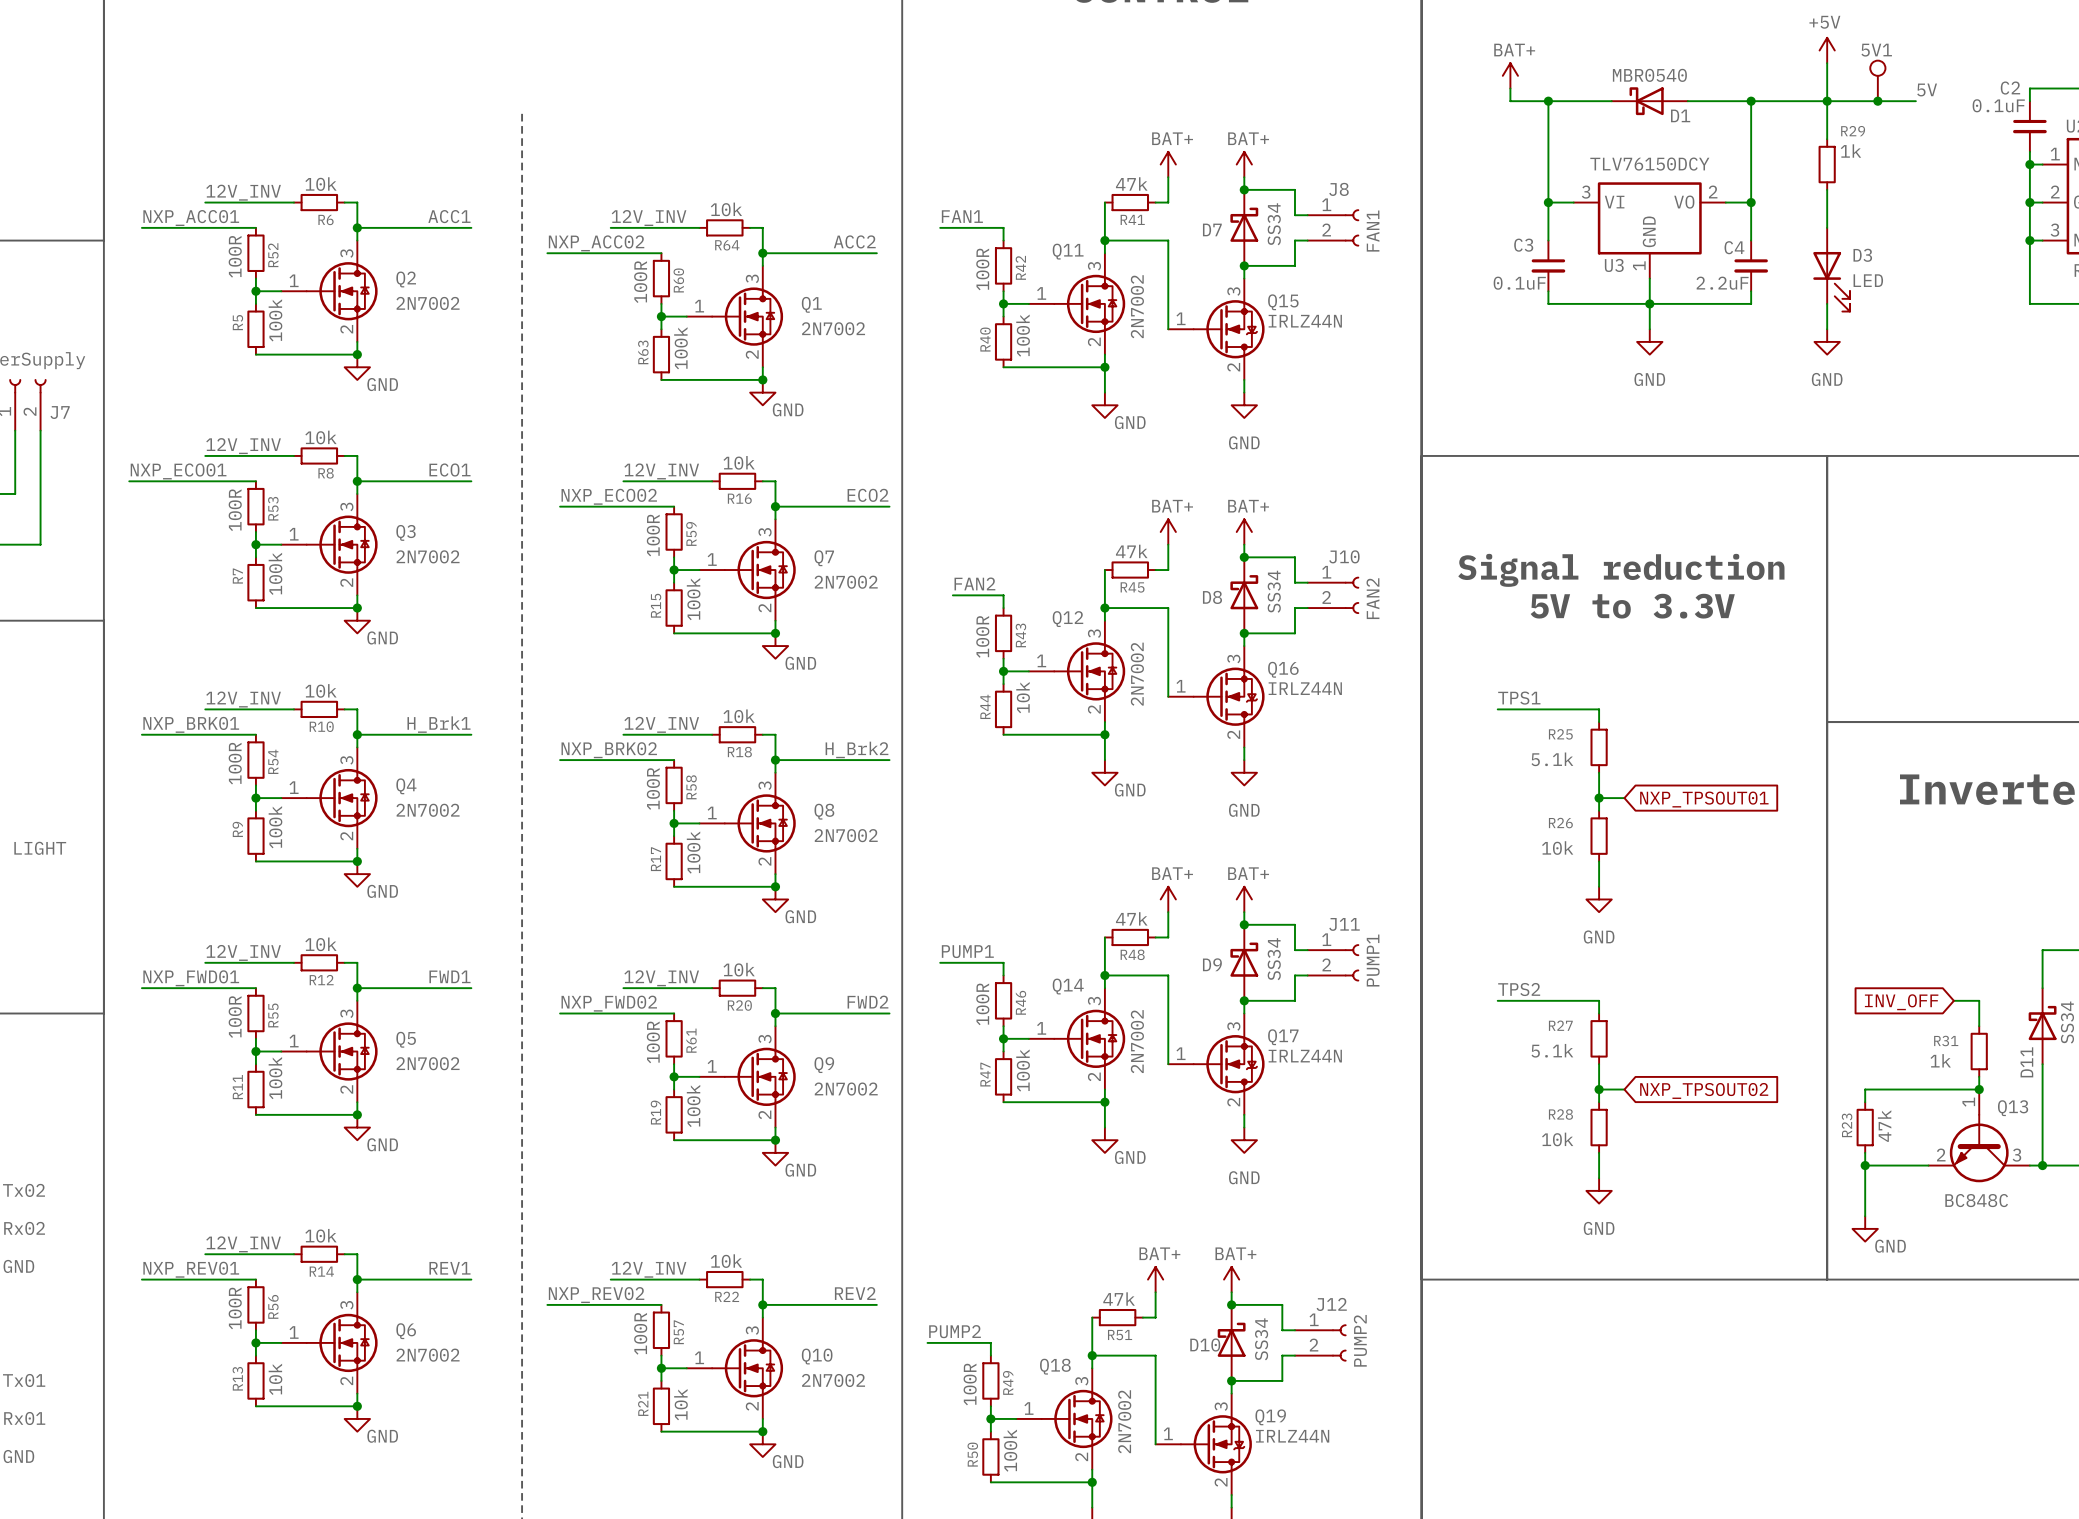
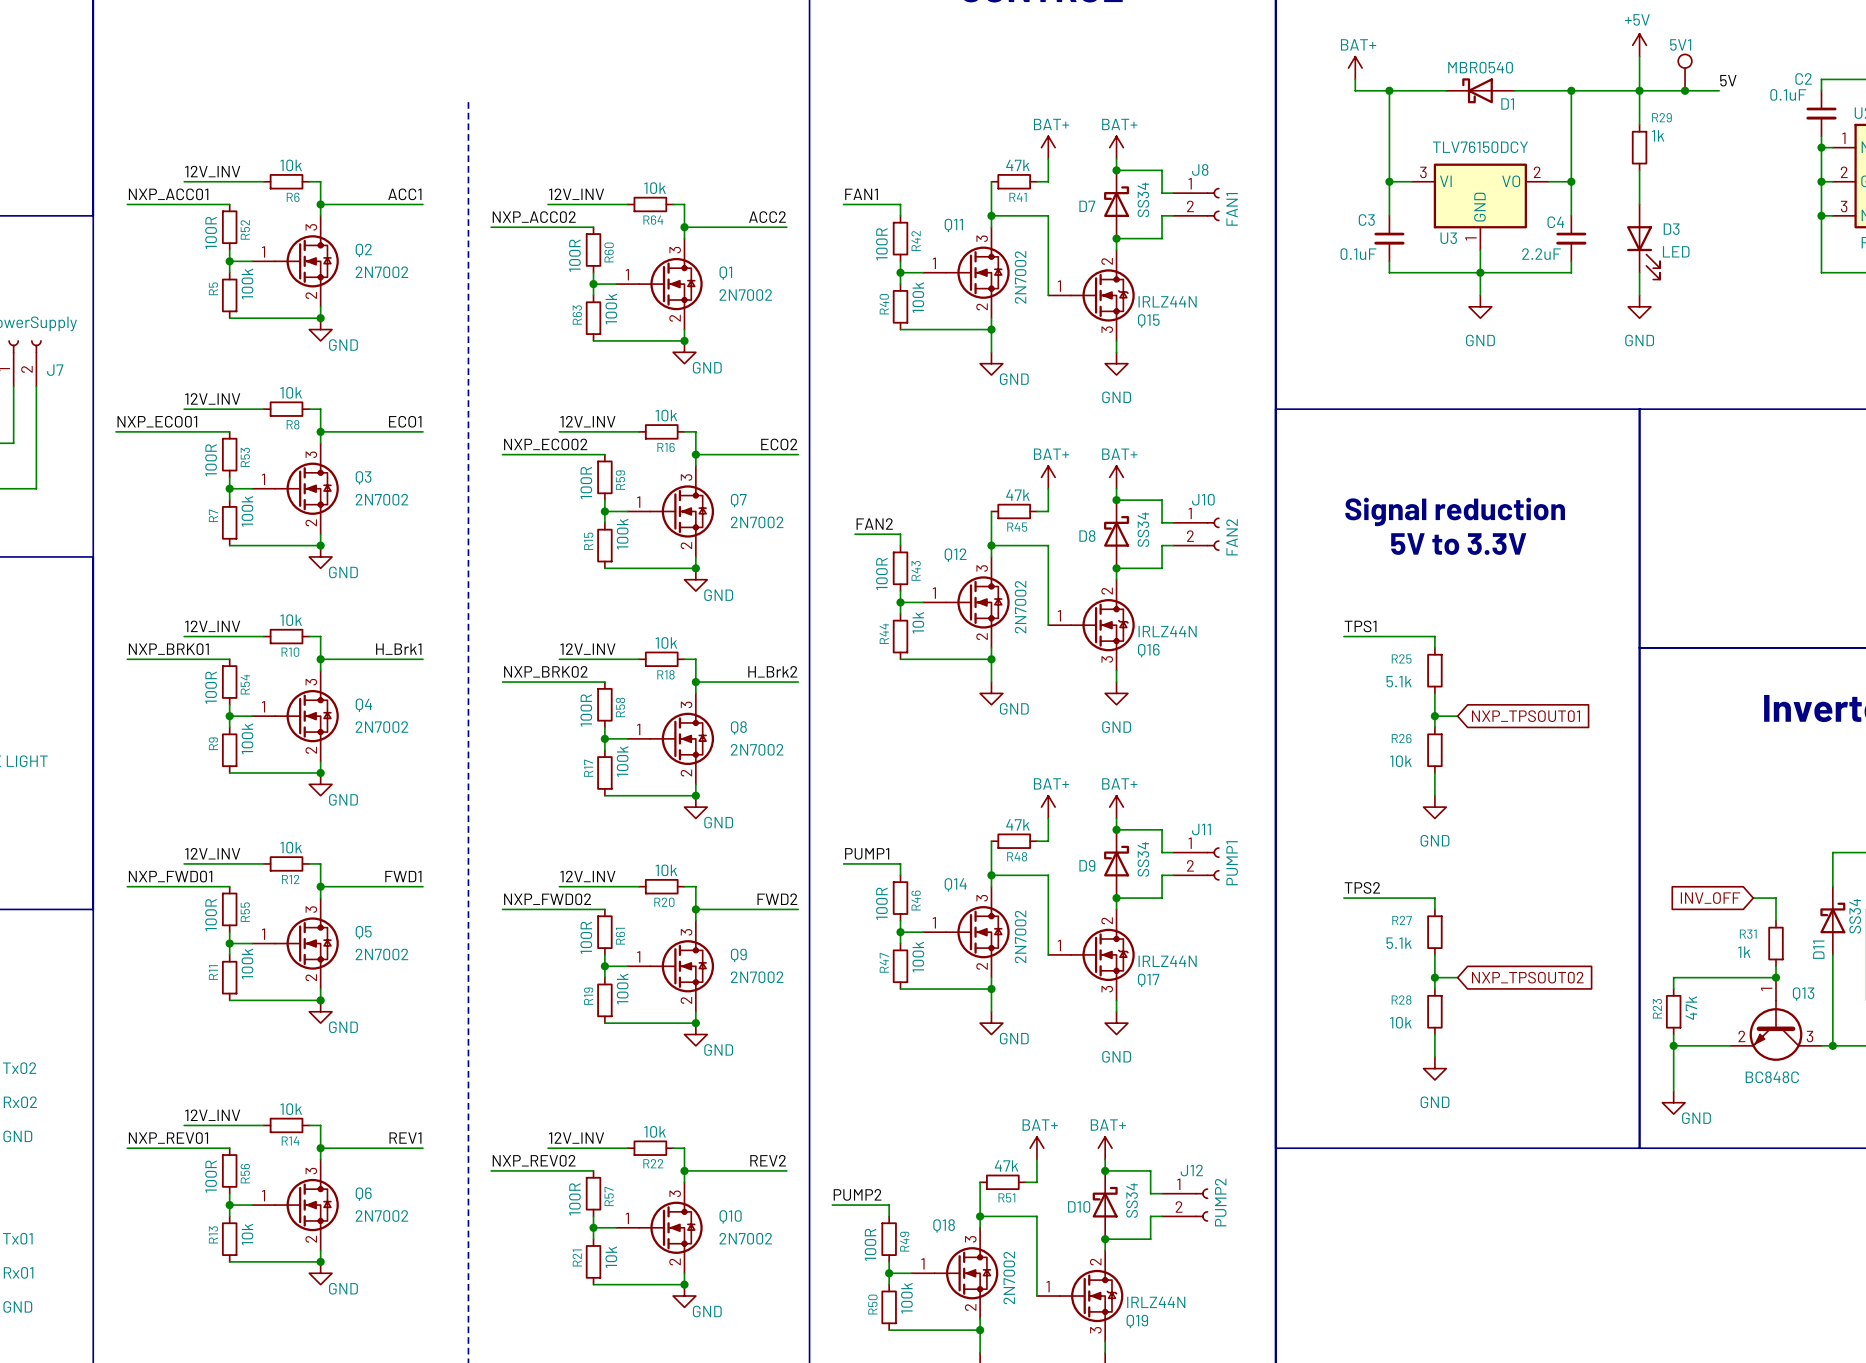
Q15 flip: as is (1229, 329) -> up-down (1102, 295)
Q16 flip: as is (1229, 696) -> up-down (1102, 625)
Q17 flip: as is (1229, 1064) -> up-down (1102, 954)
Q19 flip: as is (1216, 1444) -> up-down (1091, 1296)

